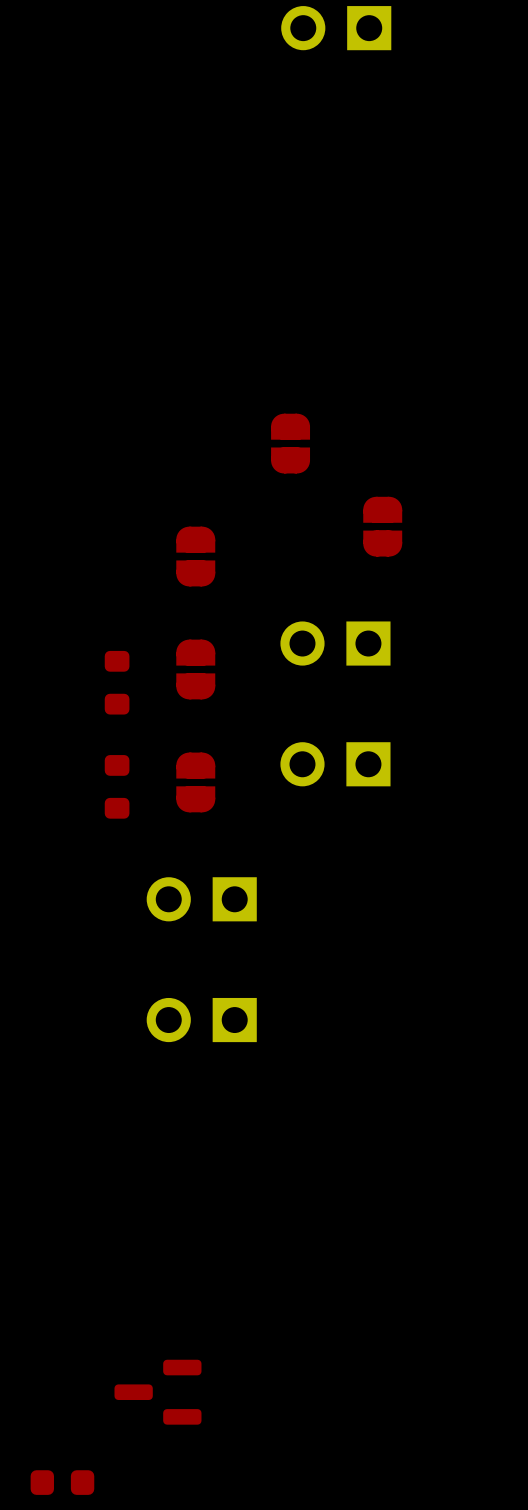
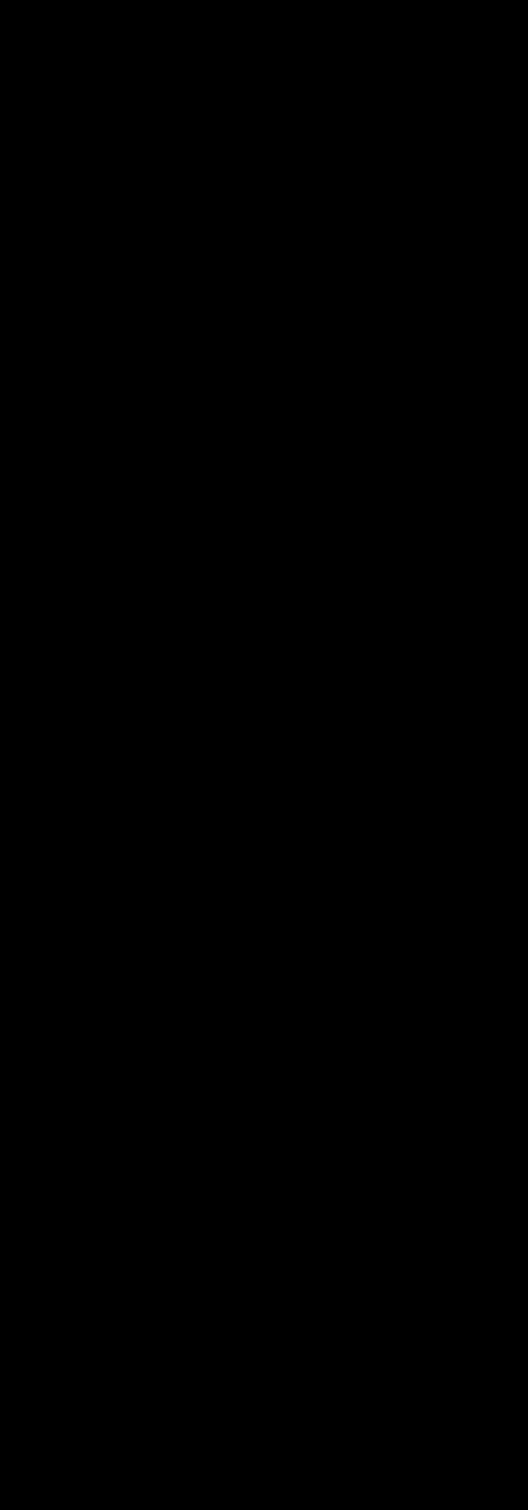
part: (336, 28) -> none
part: (290, 443) -> none
part: (382, 526) -> none
part: (195, 556) -> none
part: (335, 643) -> none
part: (195, 669) -> none
part: (117, 682) -> none
part: (335, 764) -> none
part: (195, 782) -> none
part: (117, 786) -> none
part: (201, 899) -> none
part: (201, 1020) -> none
part: (157, 1392) -> none
part: (62, 1482) -> none

